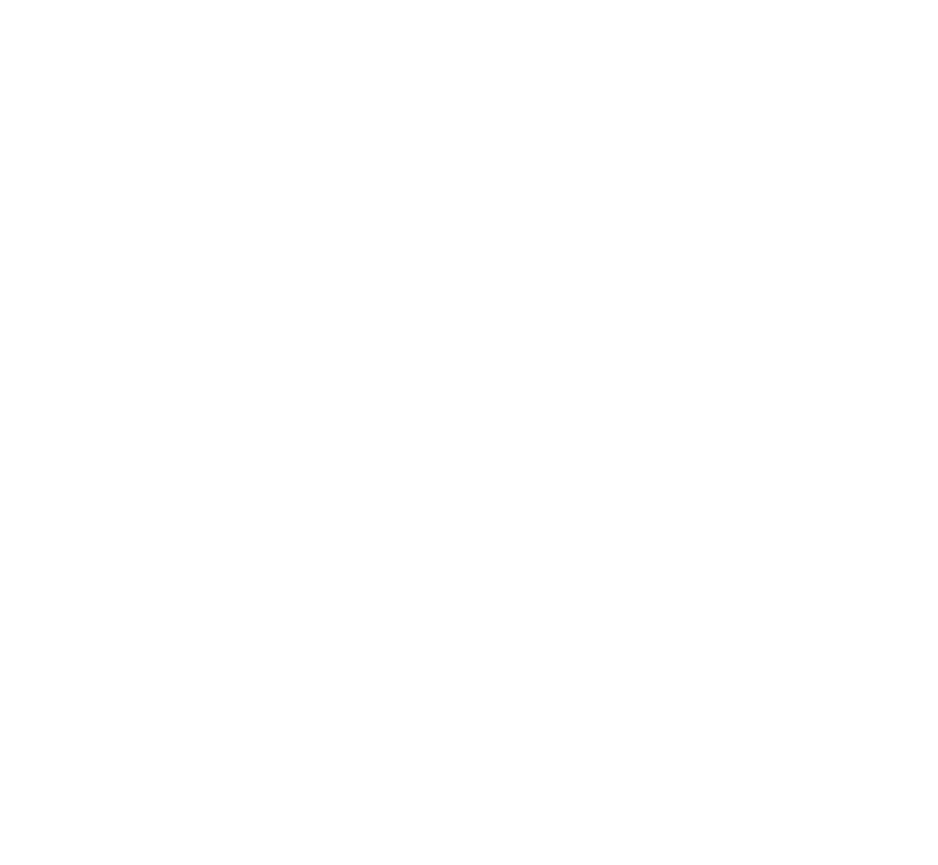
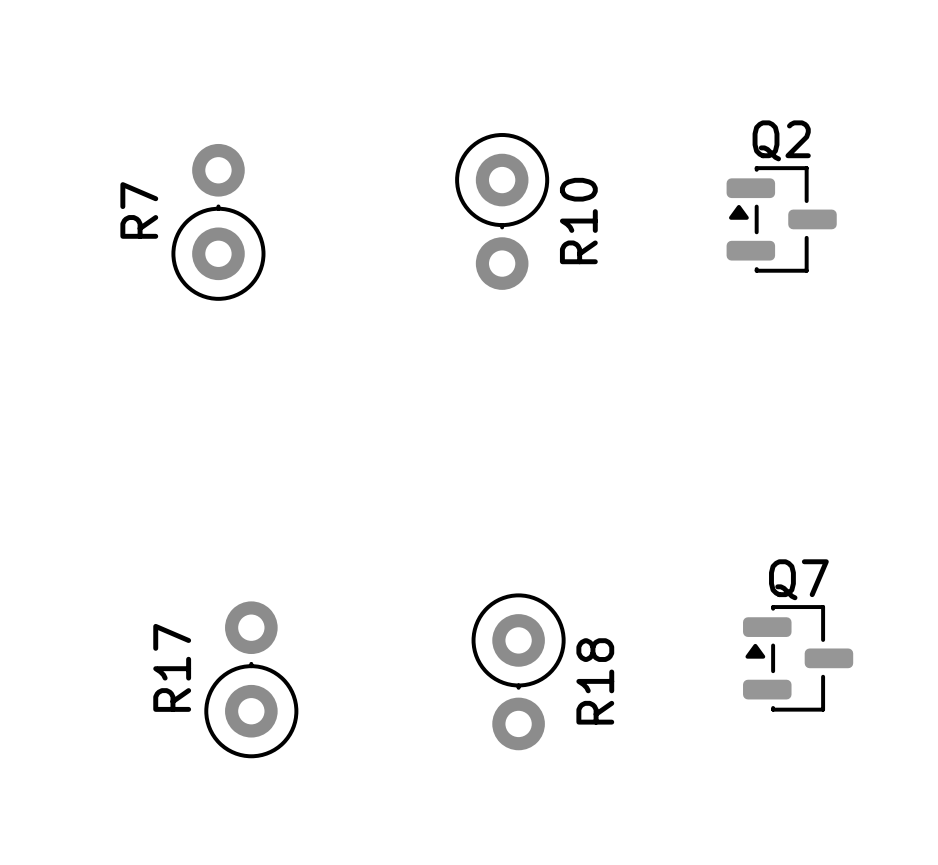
R10: none -> (502, 211)
Q2: none -> (781, 219)
R7: none -> (218, 222)
Q7: none -> (798, 658)
R18: none -> (518, 671)
R17: none -> (251, 679)

